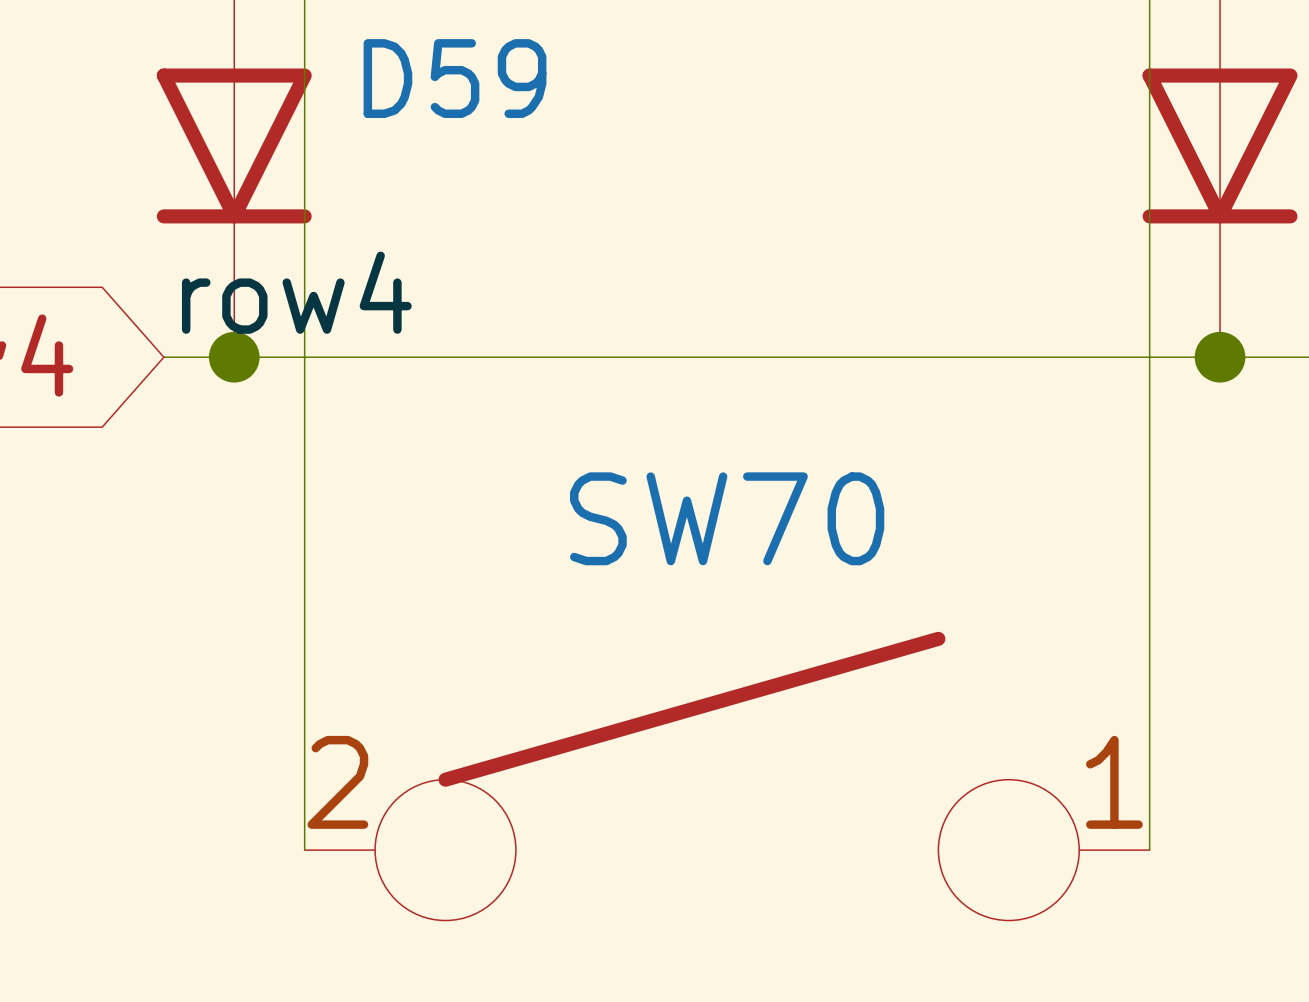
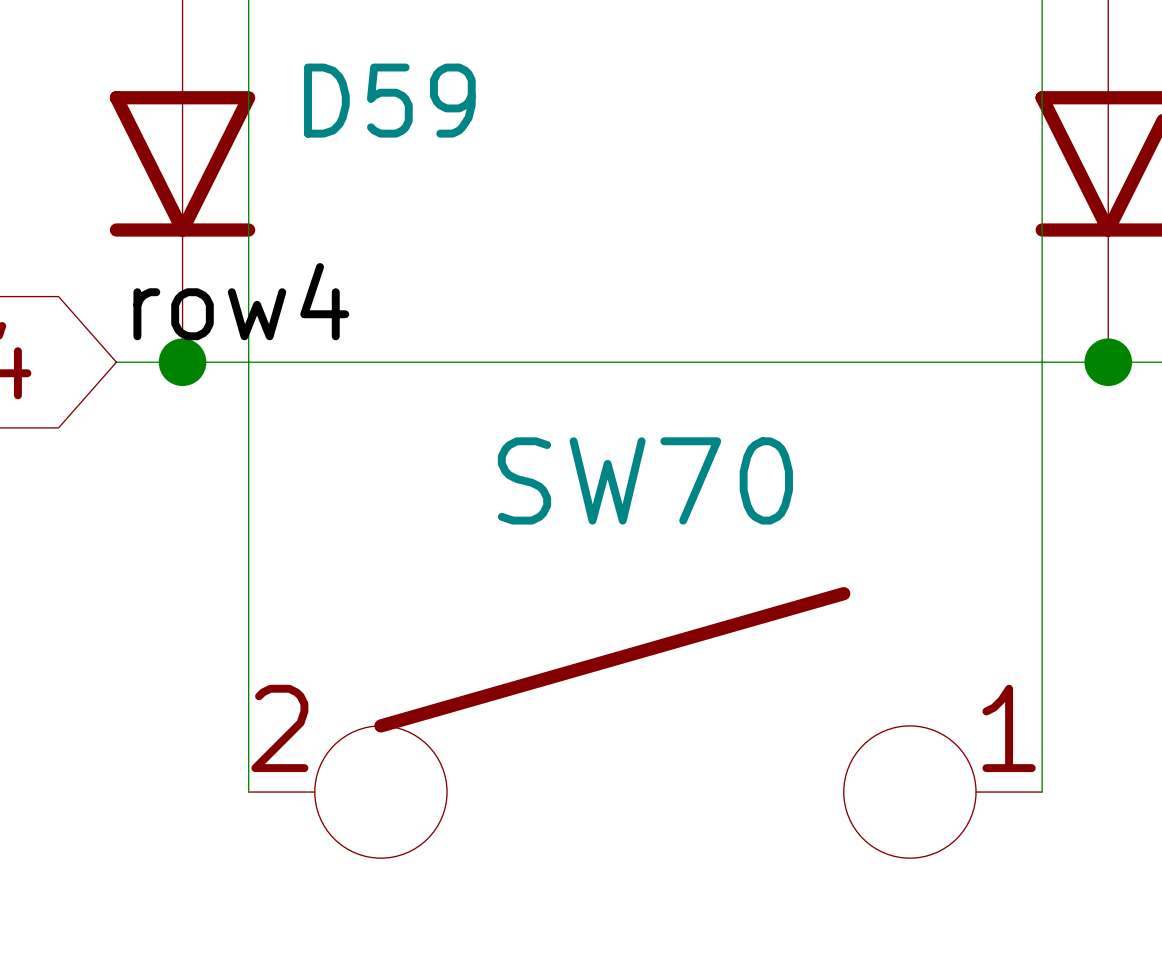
SW70 position: (727, 776) -> (645, 722)
wire: (304, 814) (304, 850) -> none
wire: (1149, 814) (1149, 850) -> none

